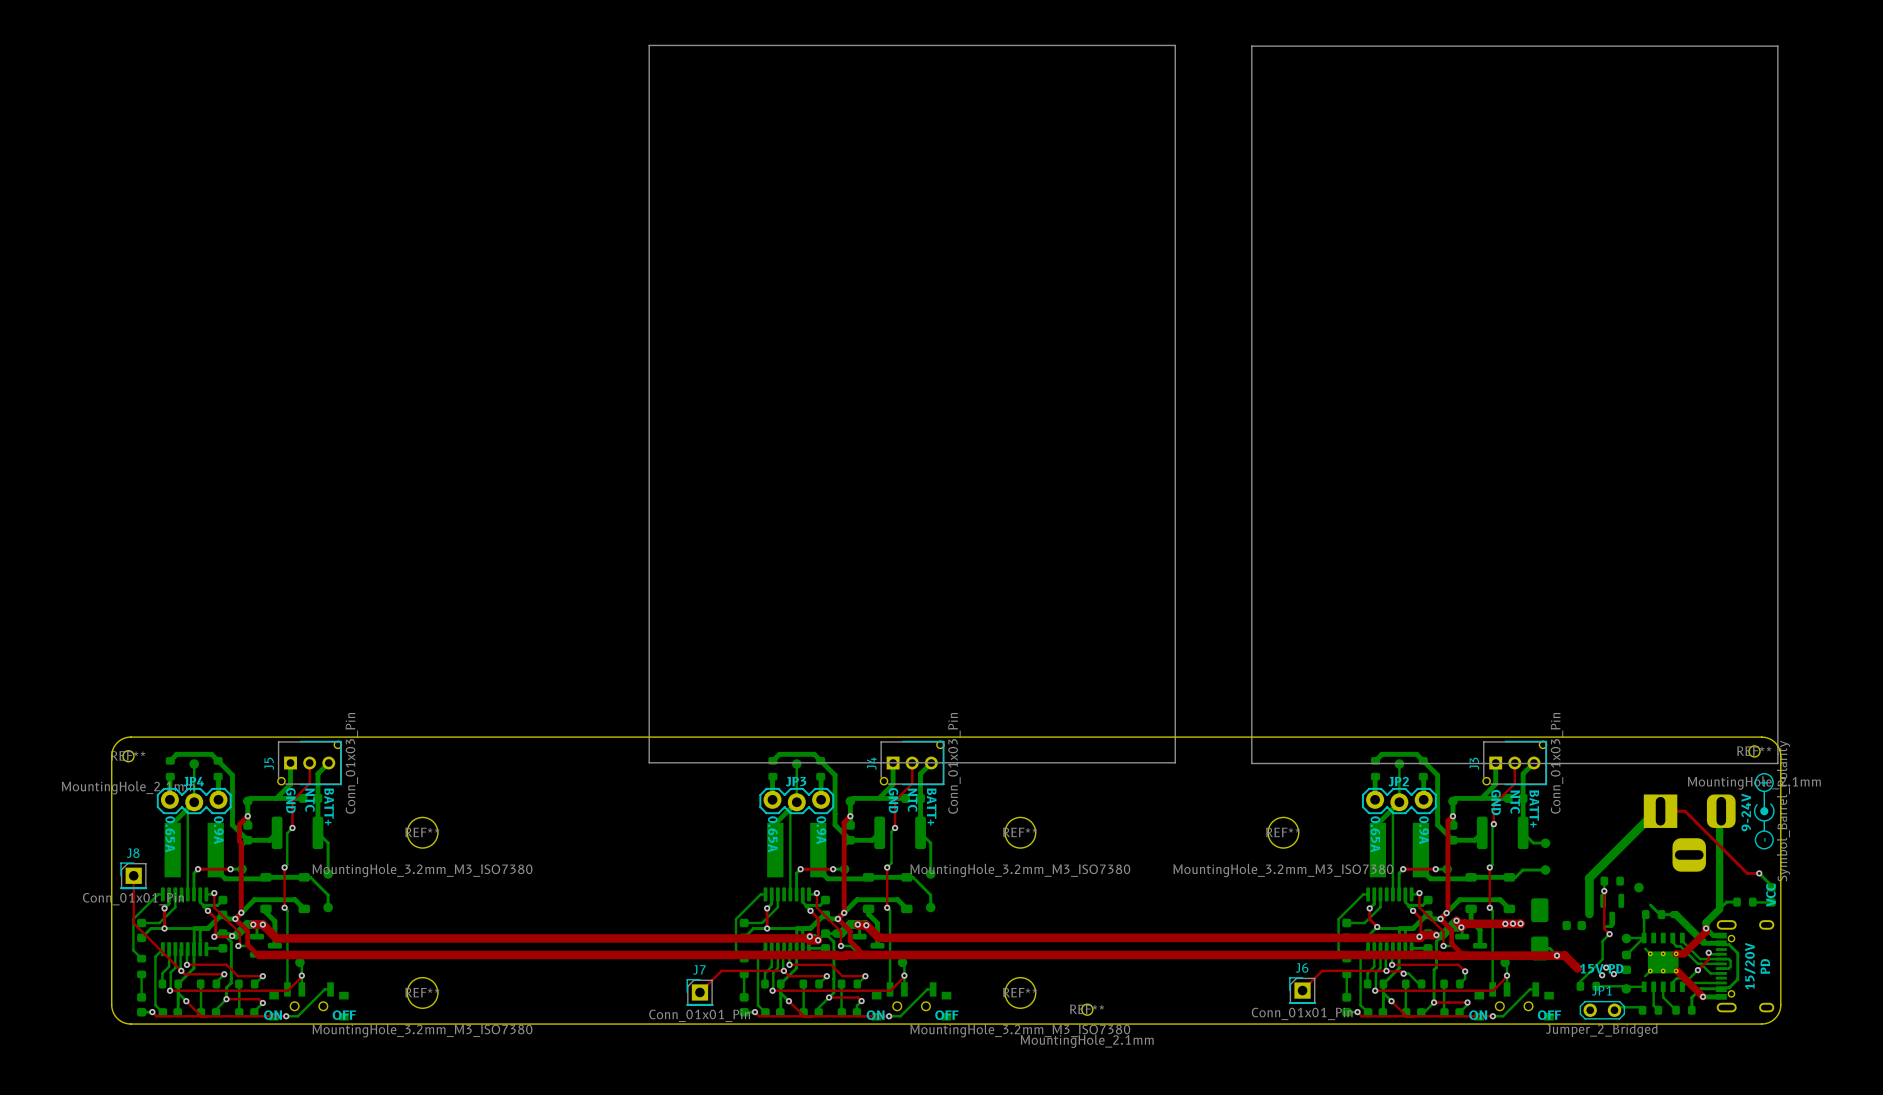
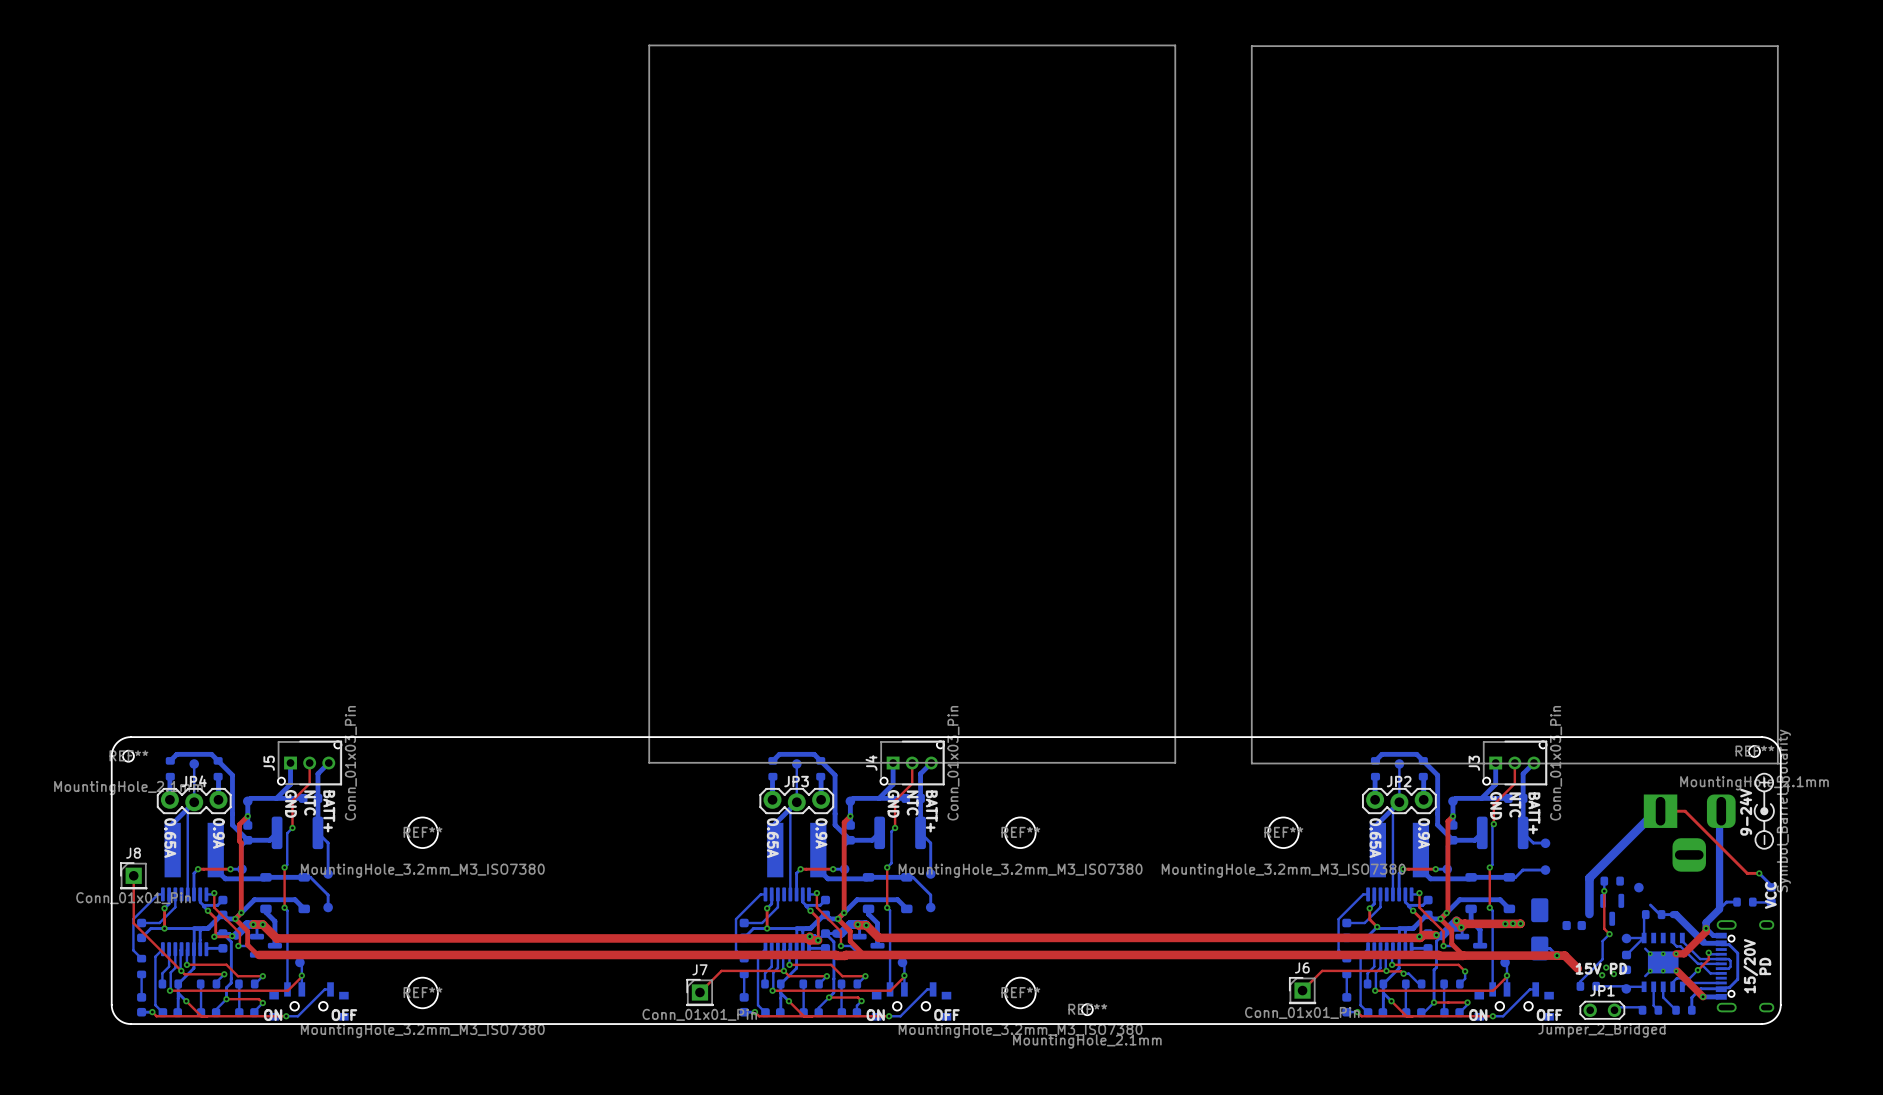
bottom track: (1612, 918) (1612, 925) (1605, 926) -> none

